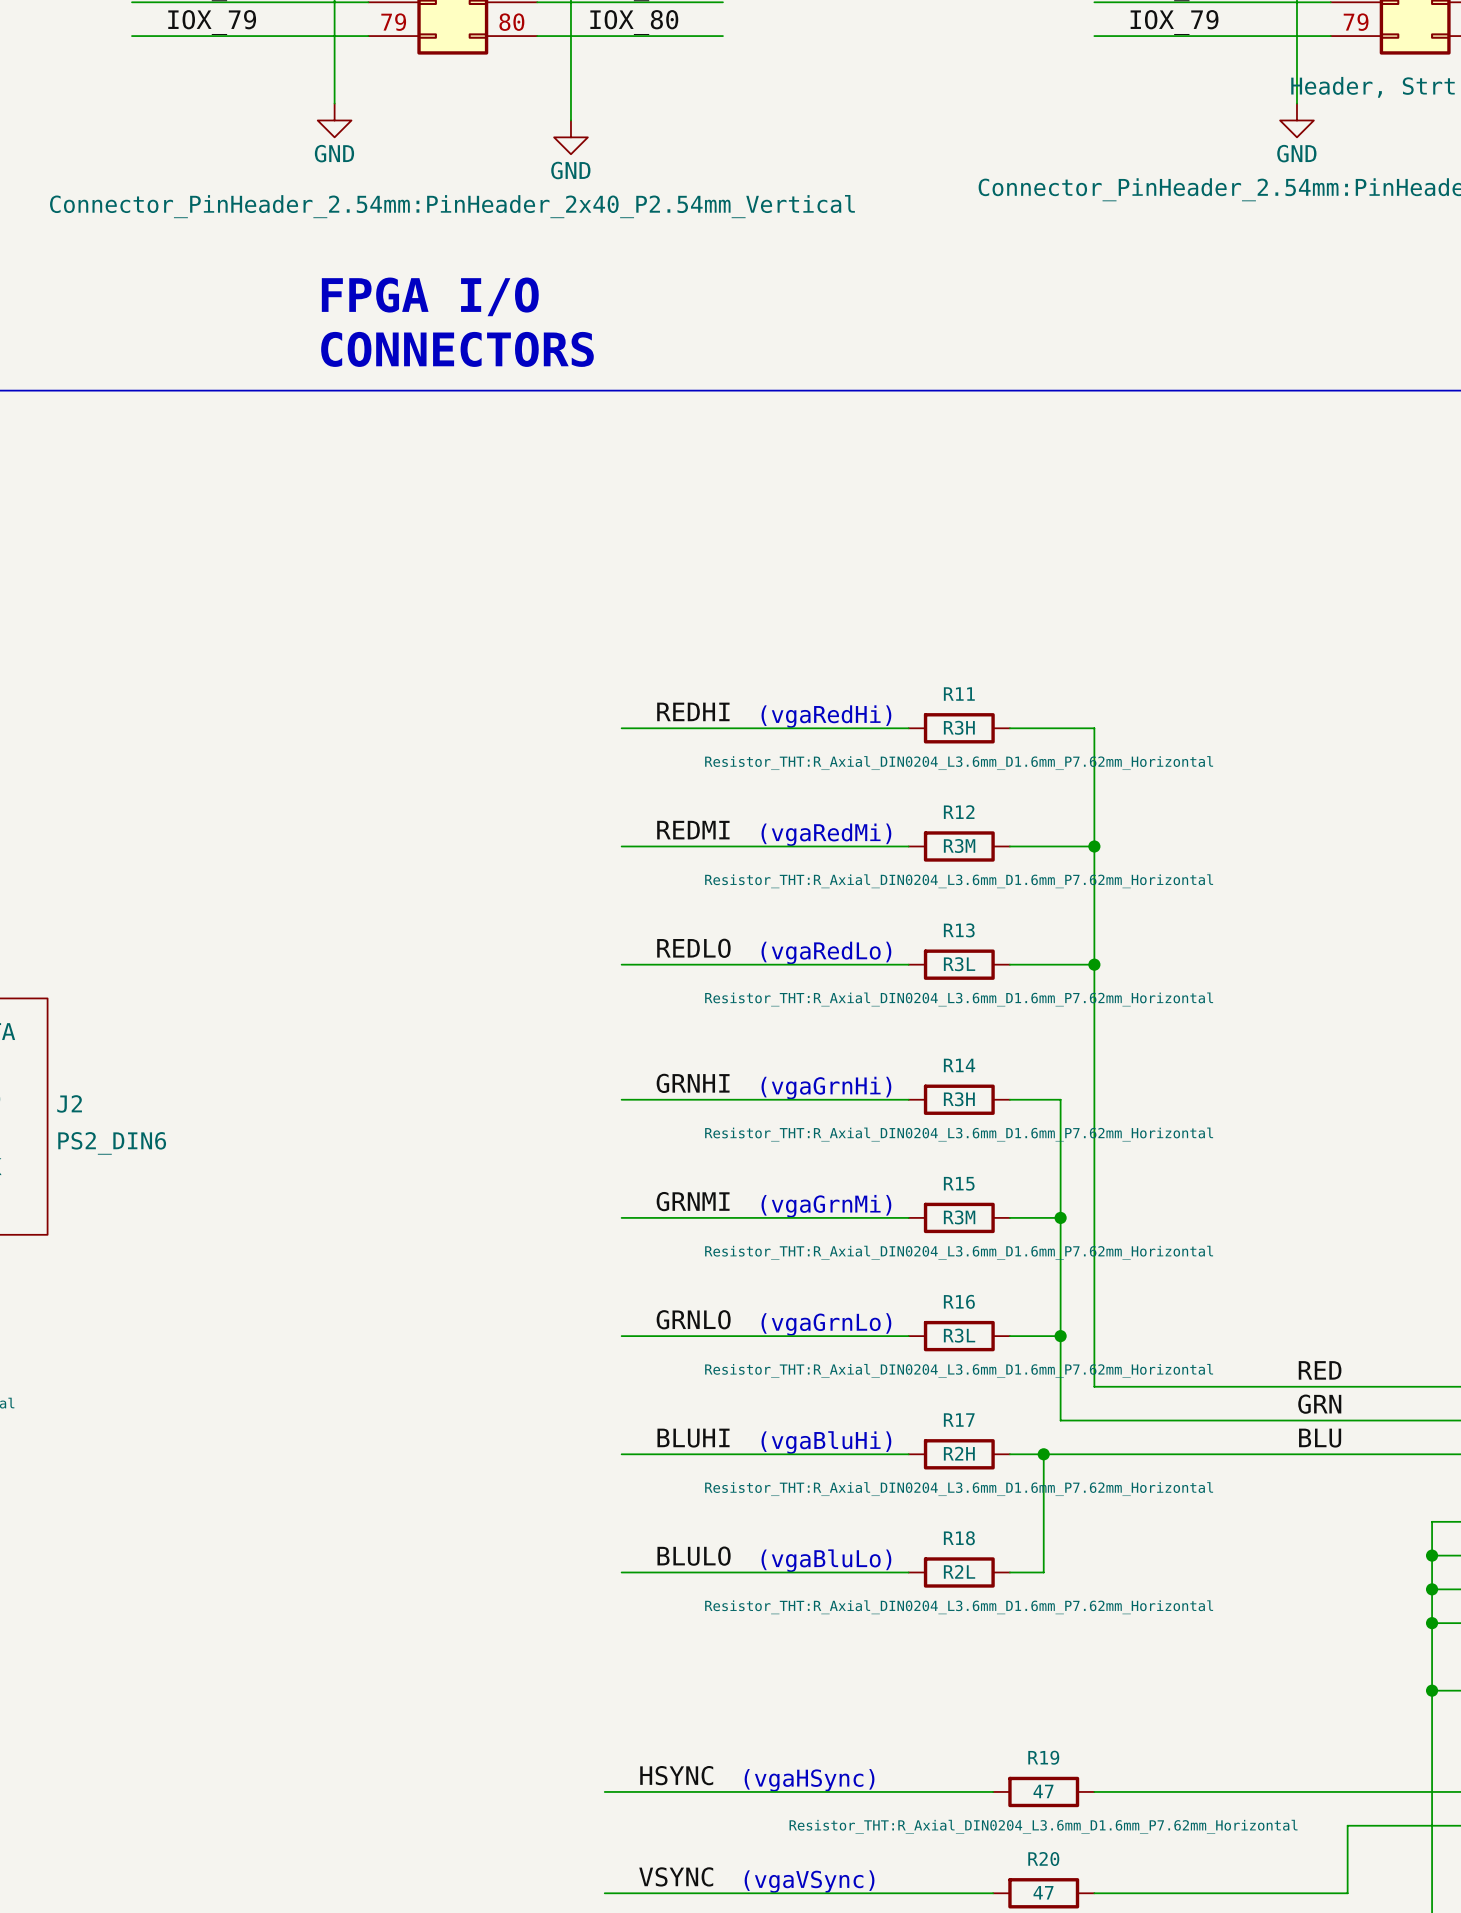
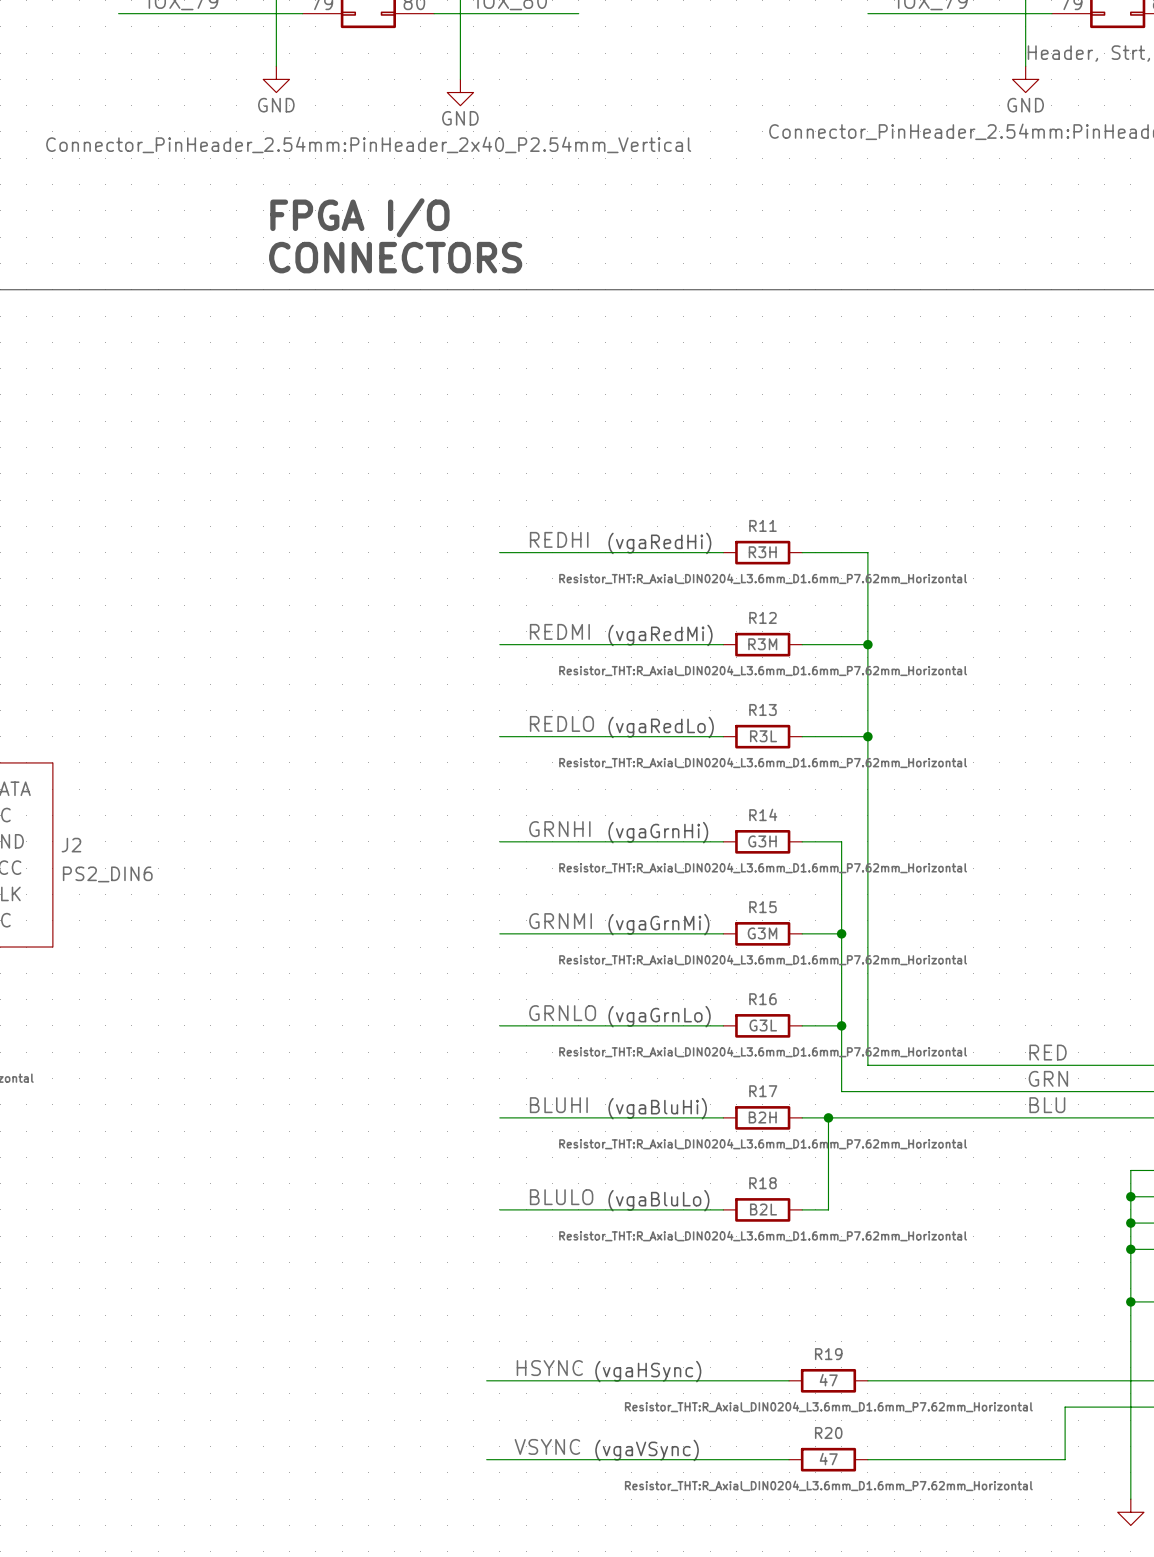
R14 value: R3H (959, 1099) -> G3H (762, 841)
R15 value: R3M (959, 1217) -> G3M (762, 933)
R16 value: R3L (959, 1335) -> G3L (763, 1025)
R17 value: R2H (959, 1453) -> B2H (762, 1117)
R18 value: R2L (959, 1571) -> B2L (763, 1209)

